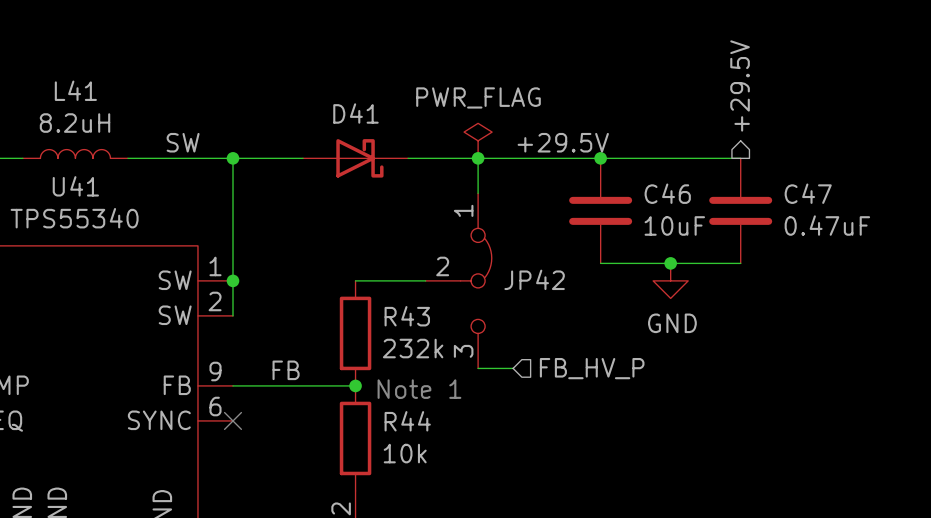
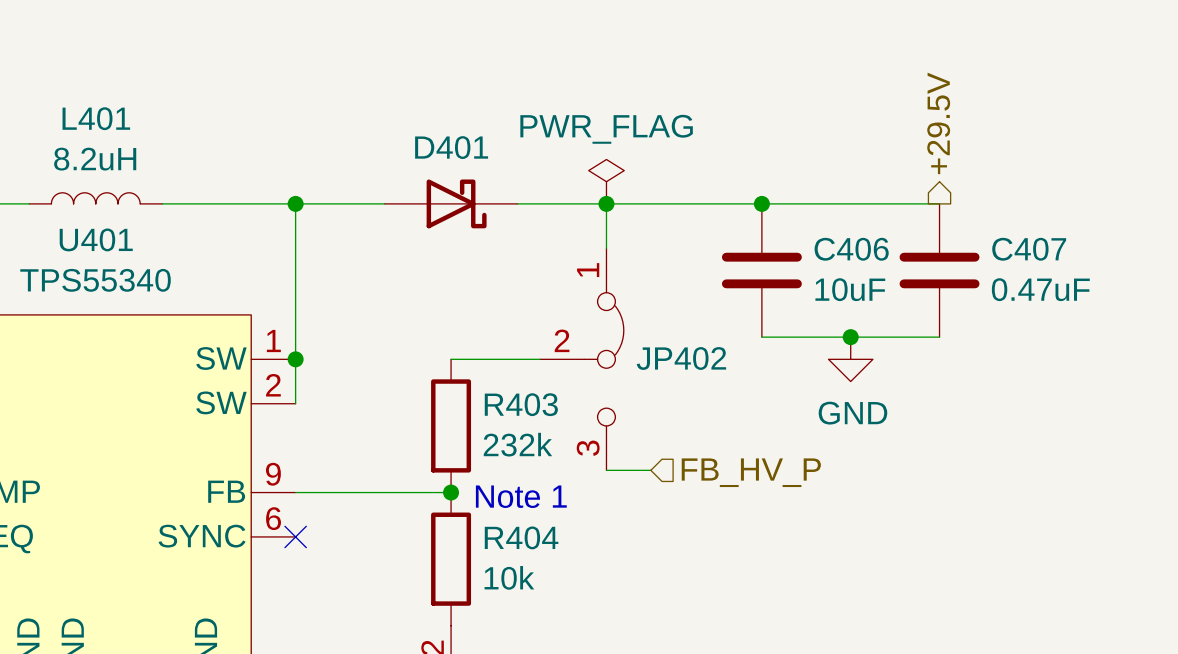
L41 name: L41 (75, 90) -> L401 (96, 118)
D41 name: D41 (355, 113) -> D401 (451, 147)
label: SW (183, 142) -> none
label: +29.5V (563, 142) -> none
U41 name: U41 (75, 186) -> U401 (96, 239)
C46 name: C46 (667, 193) -> C406 (851, 249)
C47 name: C47 (808, 193) -> C407 (1029, 249)
JP42 name: JP42 (534, 279) -> JP402 (681, 358)
R43 name: R43 (407, 316) -> R403 (521, 404)
label: FB (286, 370) -> none
R44 name: R44 (407, 421) -> R404 (521, 537)

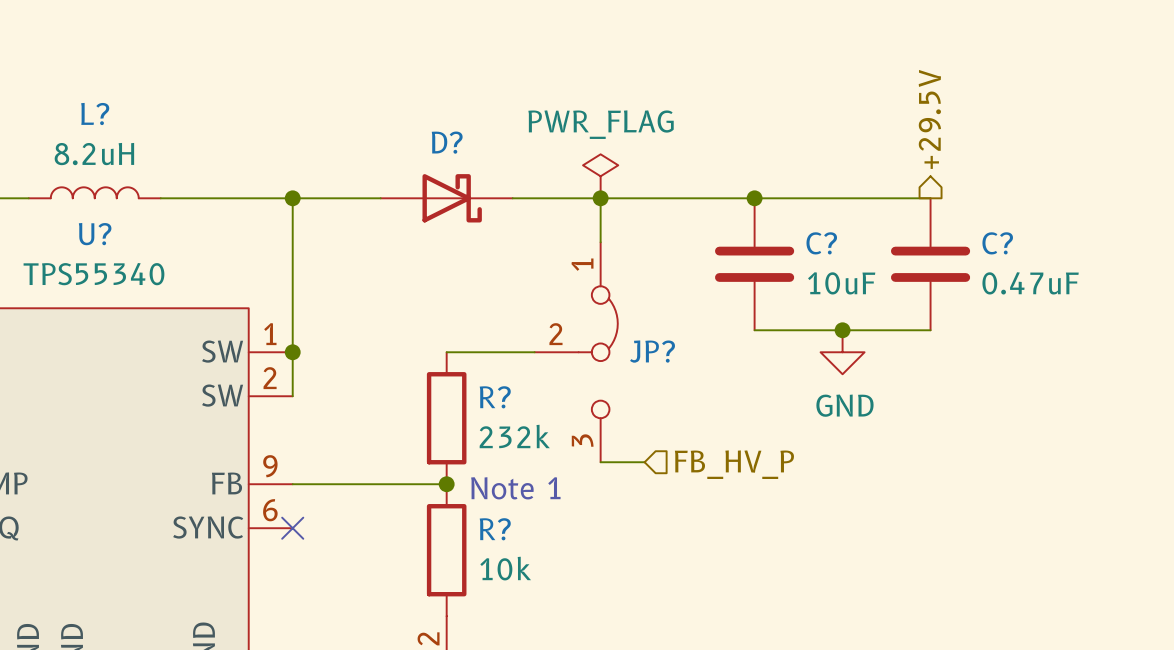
L401 name: L401 (96, 118) -> L? (95, 114)
D401 name: D401 (451, 147) -> D? (447, 142)
U401 name: U401 (96, 239) -> U? (95, 234)
C406 name: C406 (851, 249) -> C? (821, 243)
C407 name: C407 (1029, 249) -> C? (997, 243)
JP402 name: JP402 (681, 358) -> JP? (652, 351)
R403 name: R403 (521, 404) -> R? (495, 397)
R404 name: R404 (521, 537) -> R? (495, 529)

